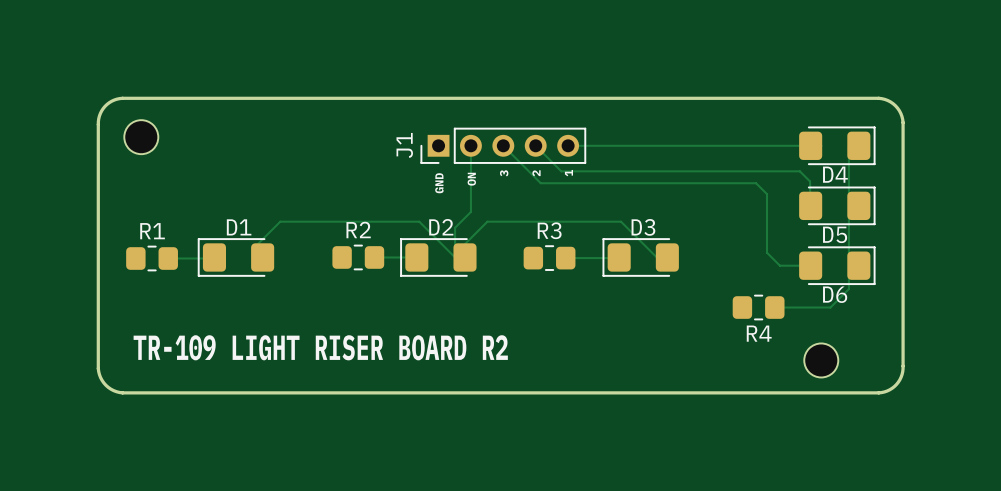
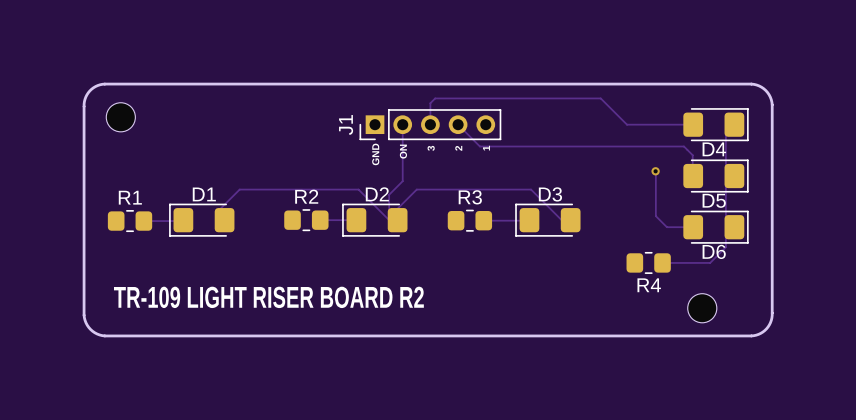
track: (503, 145) (540, 183) (756, 183) (767, 194) (767, 200) -> (430, 124) (430, 103) (435, 98) (600, 98) (626, 124)
track: (568, 145) (733, 145) -> none
via: none -> (655, 171)

